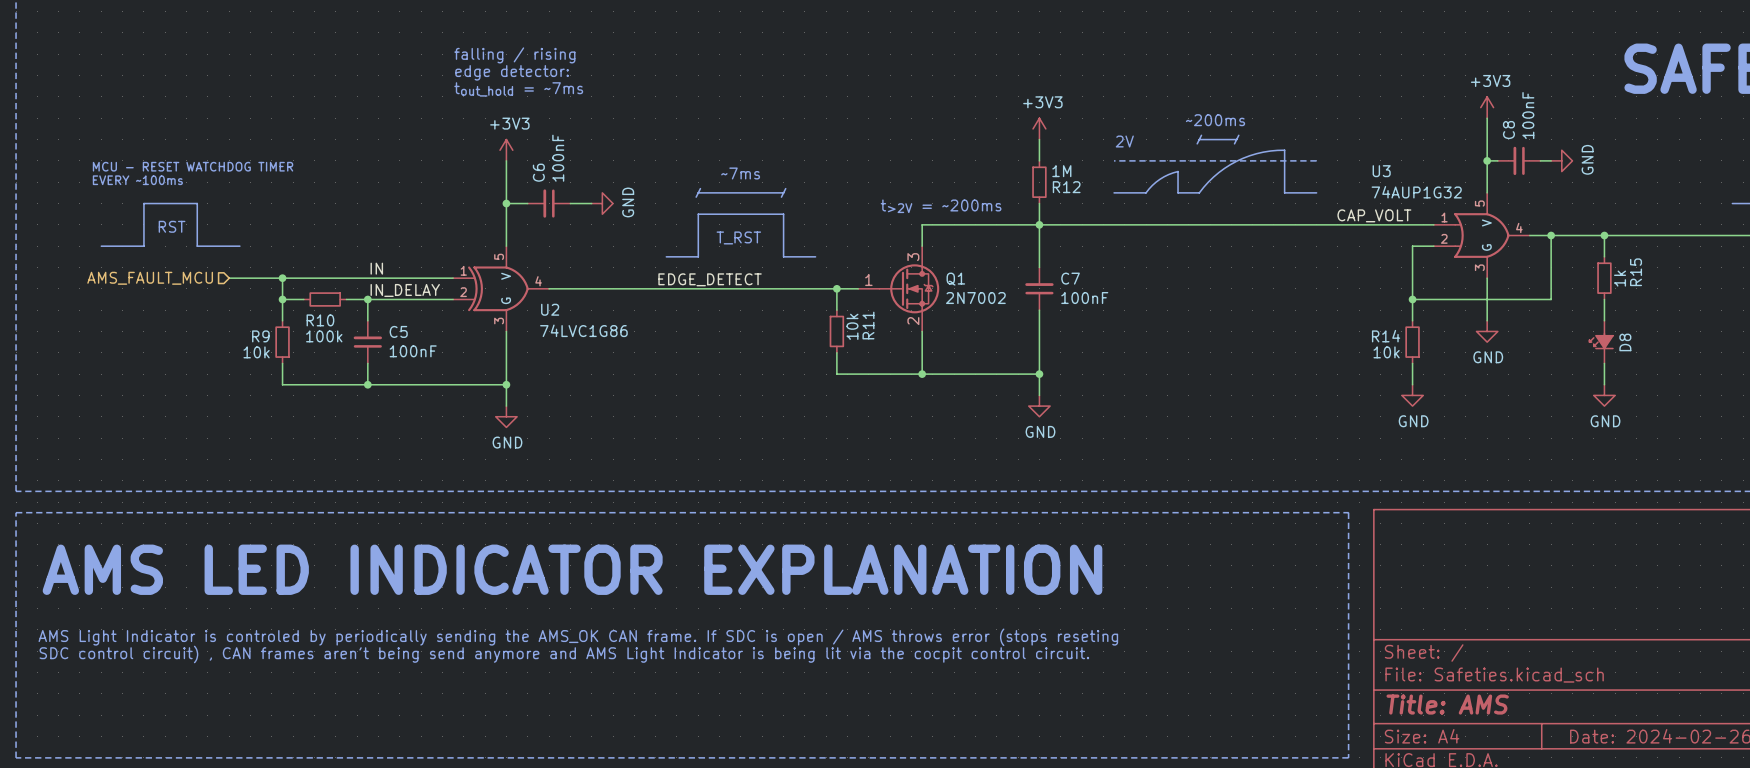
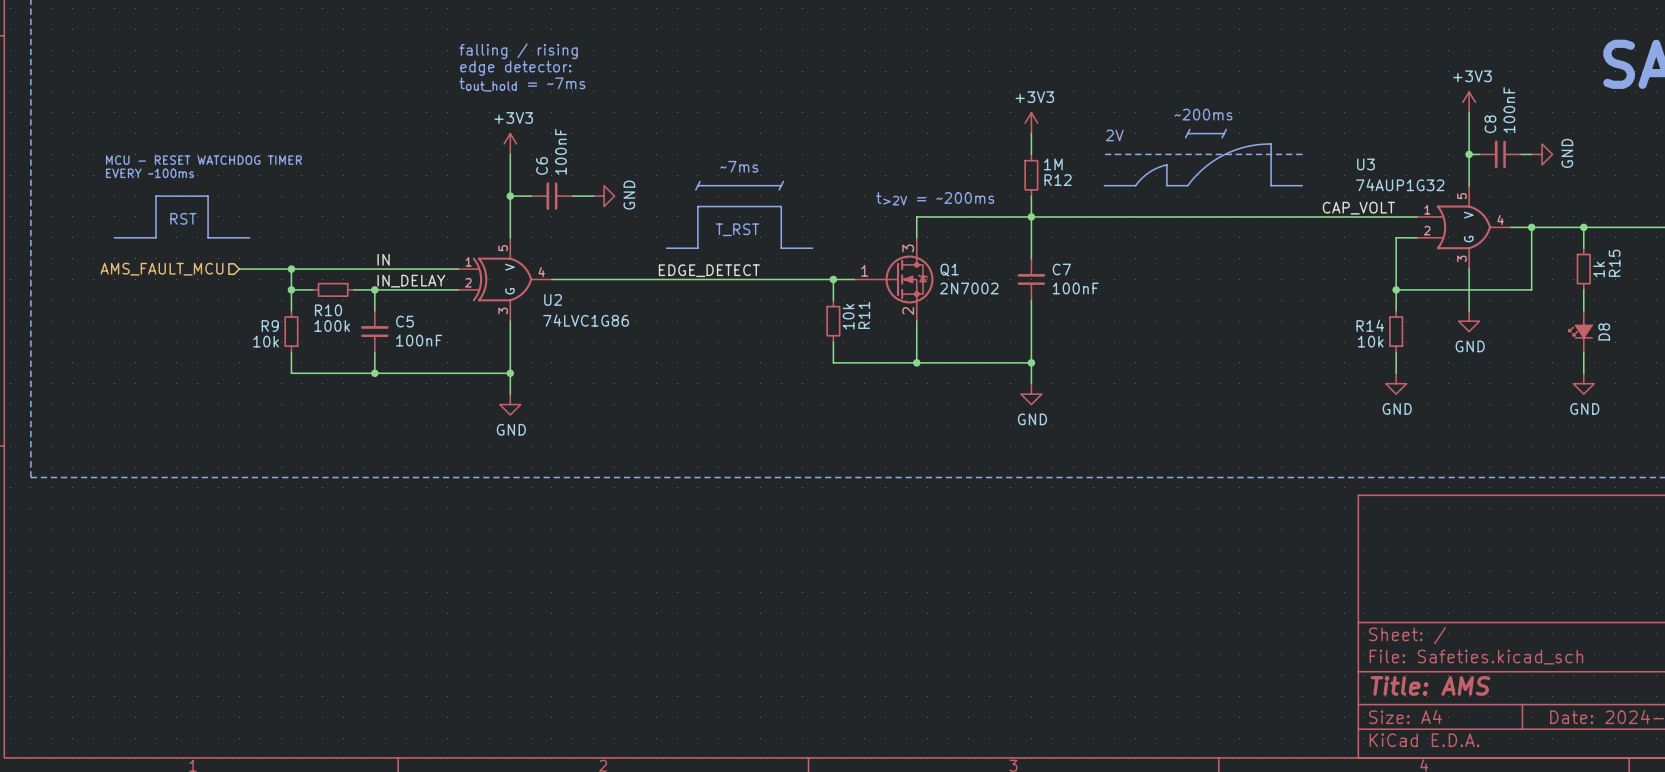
line: (16, 512) (1348, 512) (1348, 757) (16, 757) (16, 512) -> none
text: AMS LED INDICATOR EXPLANATION (572, 569) -> none
text: AMS Light Indicator is controled by periodically sending the AMS_OK CAN frame. If SDC is open / AMS throws error (stops reseting (578, 637) -> none
text: SDC control circuit) , CAN frames aren't being send anymore and AMS Light Indicator is being lit via the cocpit control circuit. (564, 654) -> none

